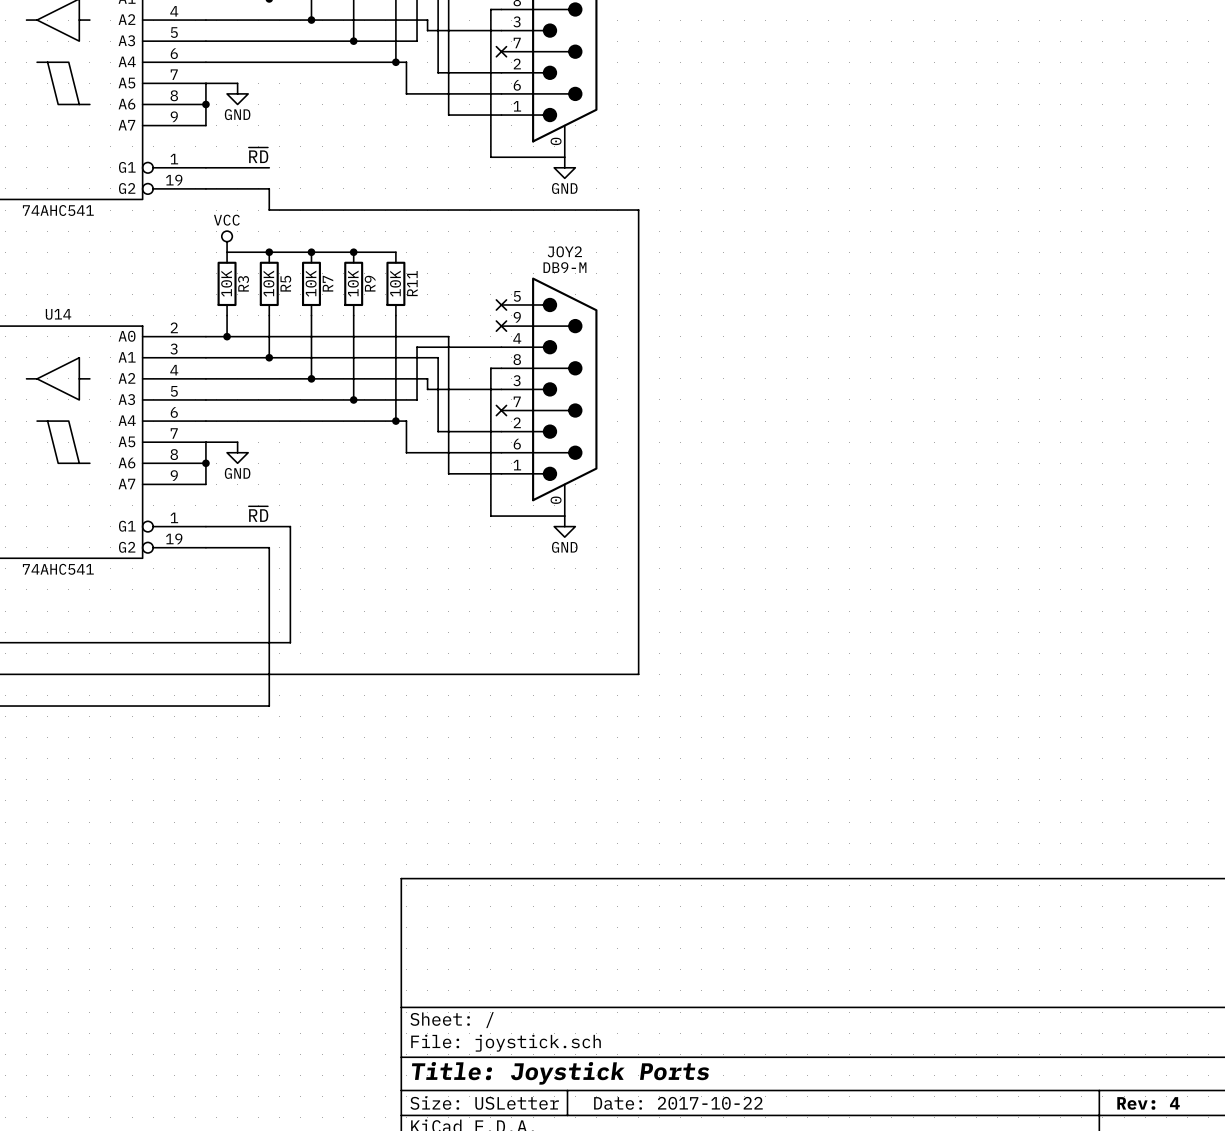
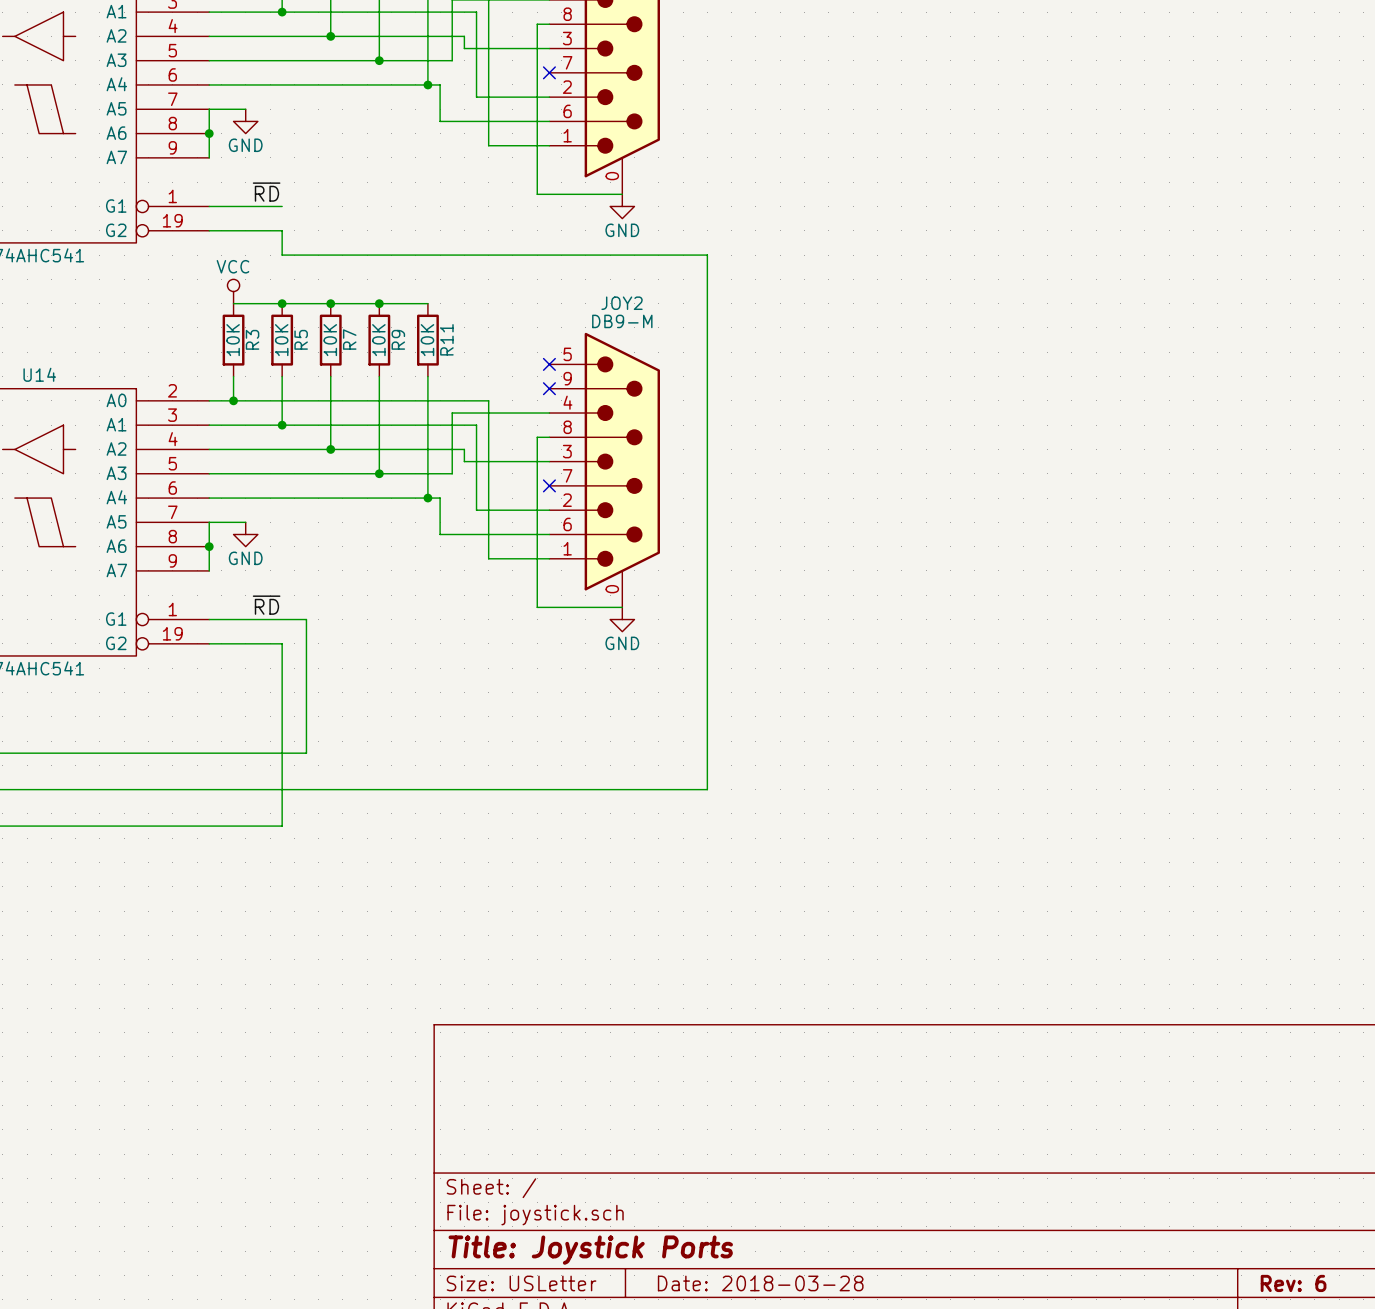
title block: Date: 2017-10-22 (678, 1103) -> Date: 2018-03-28 (760, 1283)
title block: Rev: 4 (1148, 1103) -> Rev: 6 (1293, 1283)

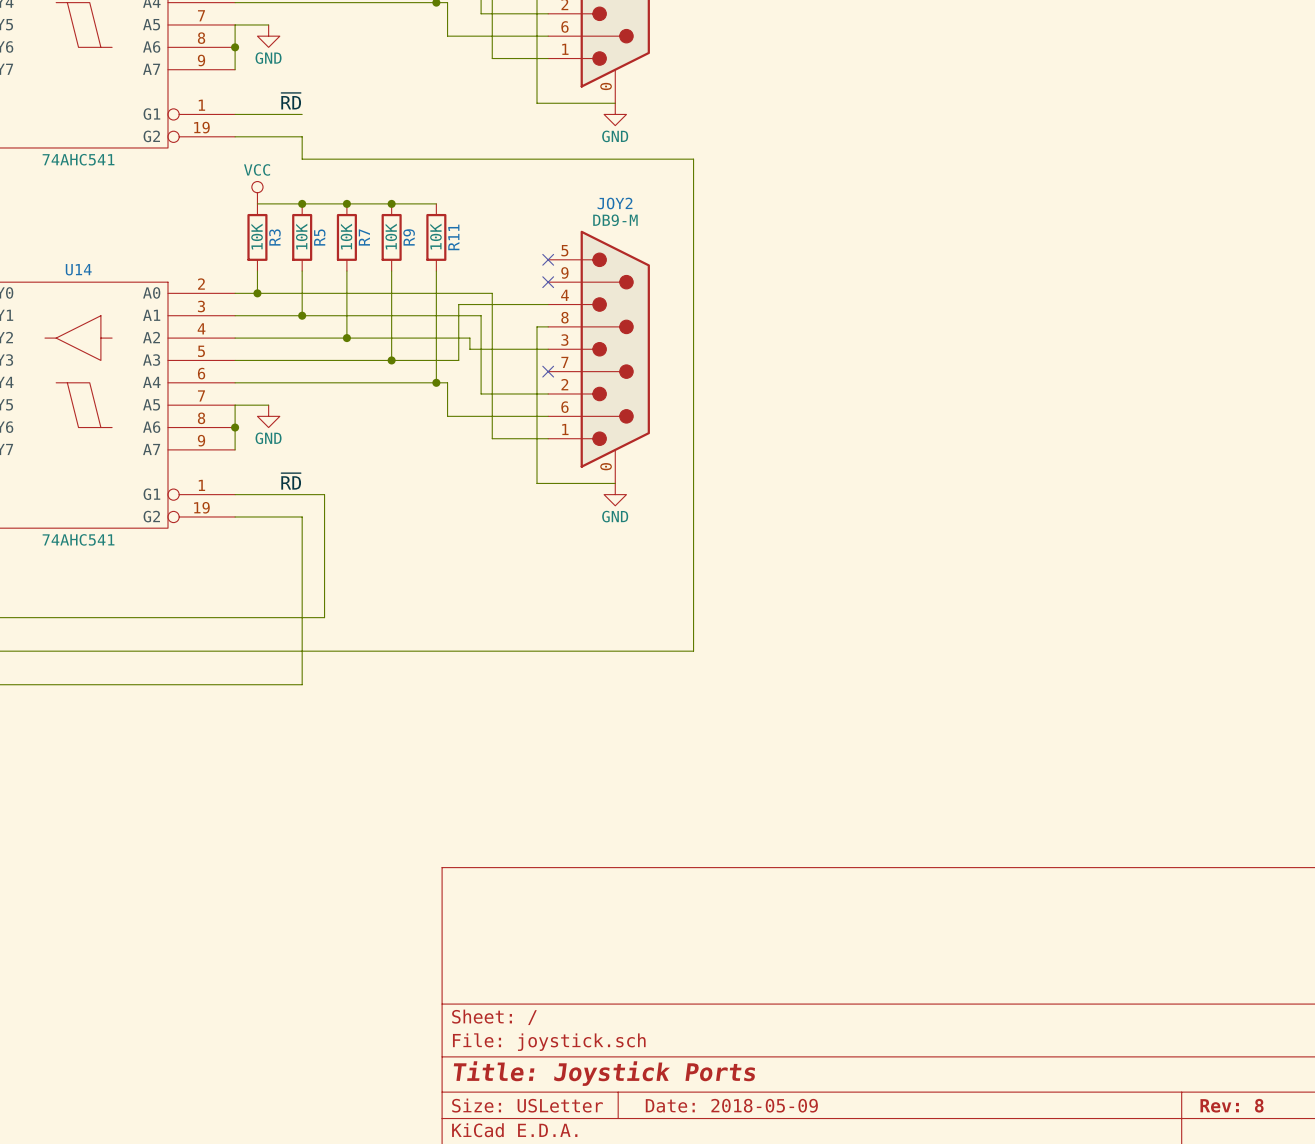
title block: Date: 2018-03-28 (760, 1283) -> Date: 2018-05-09 (731, 1105)
title block: Rev: 6 (1293, 1283) -> Rev: 8 (1232, 1105)

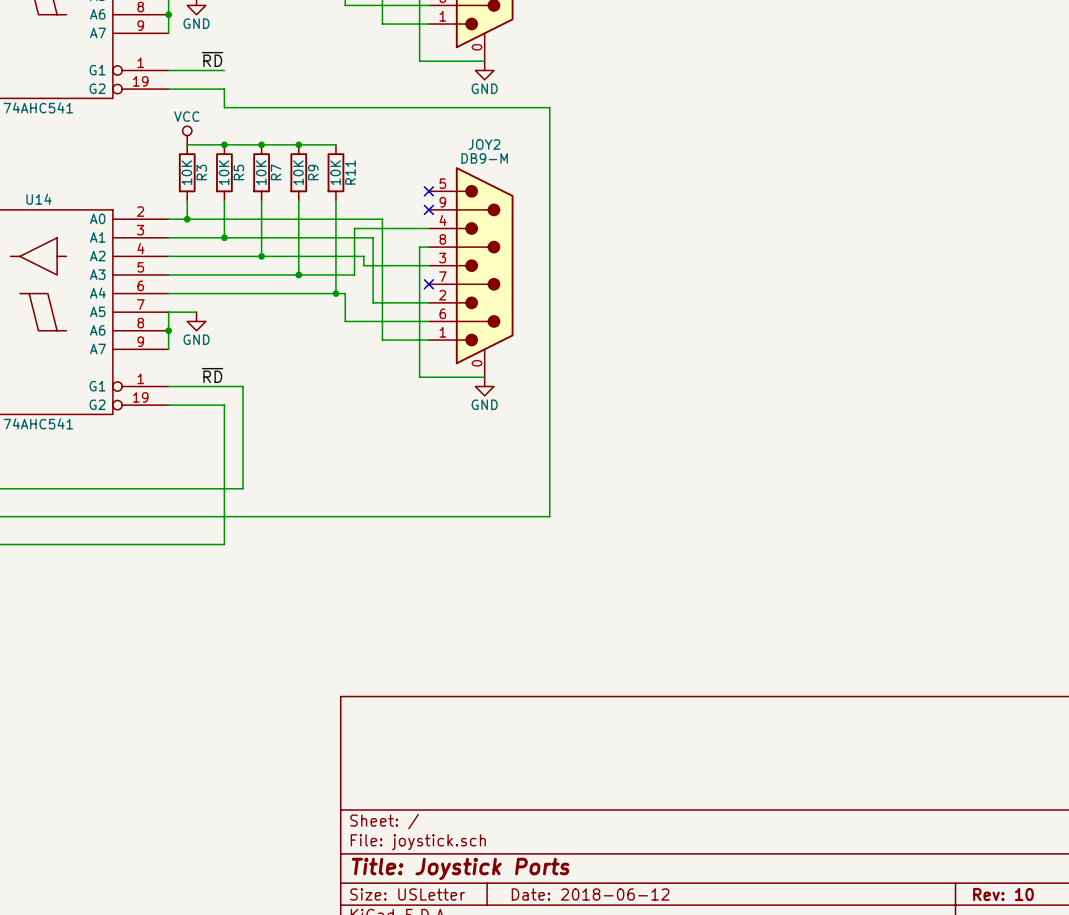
title block: Date: 2018-05-09 (731, 1105) -> Date: 2018-06-12 (590, 894)
title block: Rev: 8 (1232, 1105) -> Rev: 10 (1003, 894)

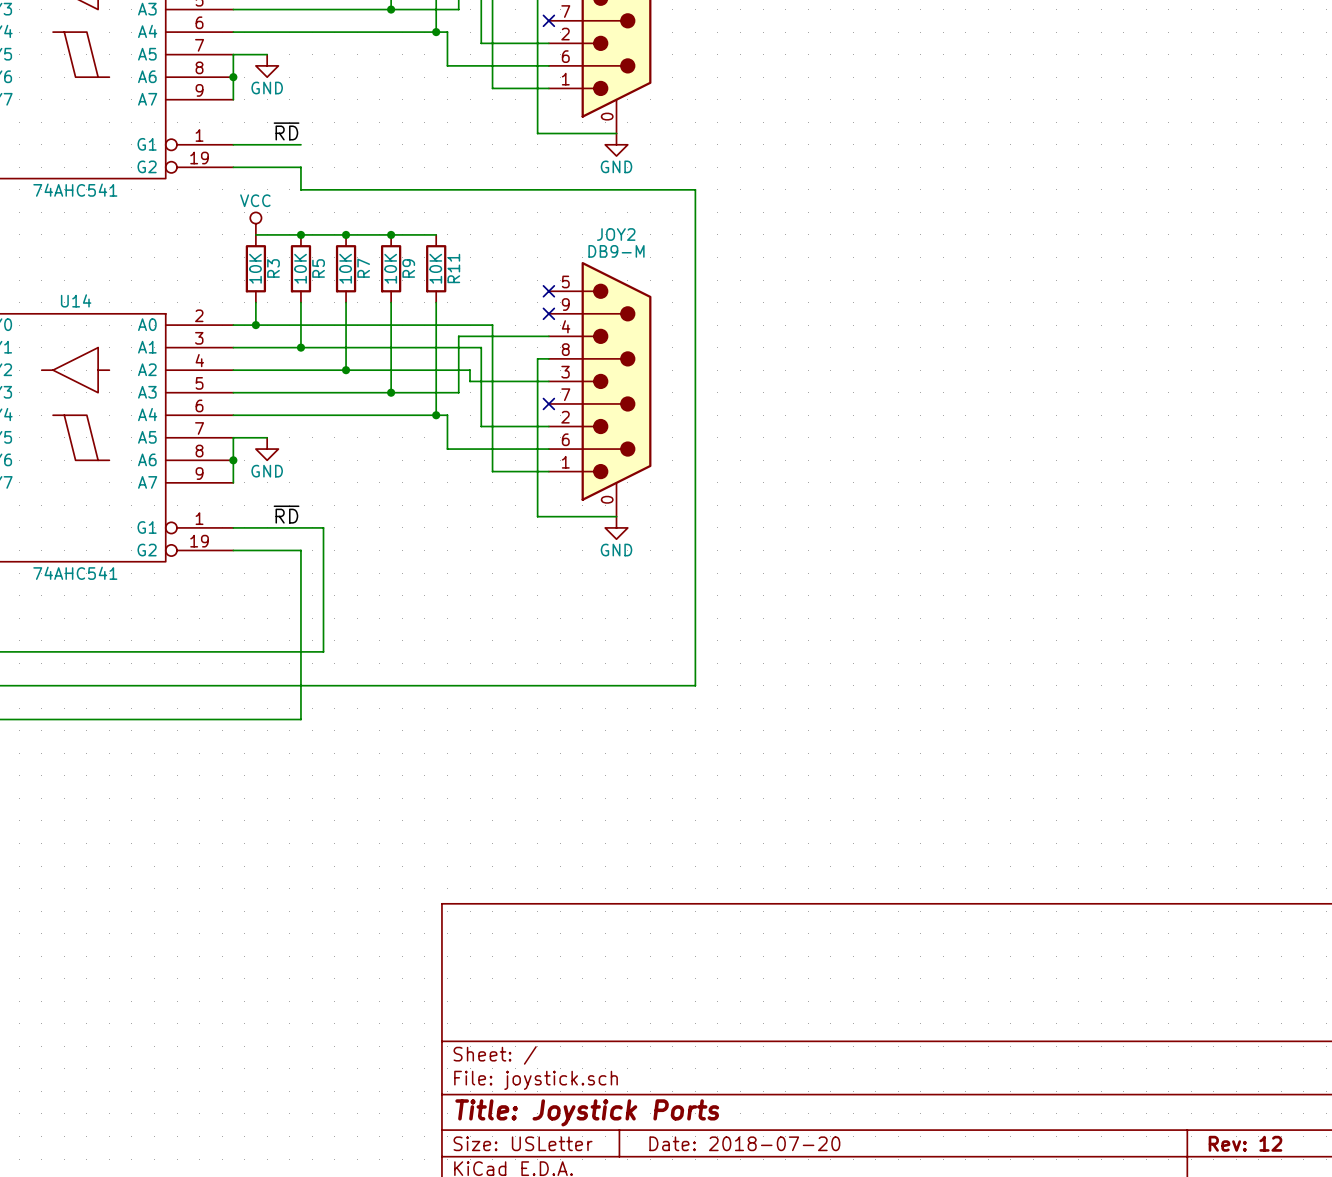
title block: Date: 2018-06-12 (590, 894) -> Date: 2018-07-20 (744, 1143)
title block: Rev: 10 (1003, 894) -> Rev: 12 (1245, 1143)

